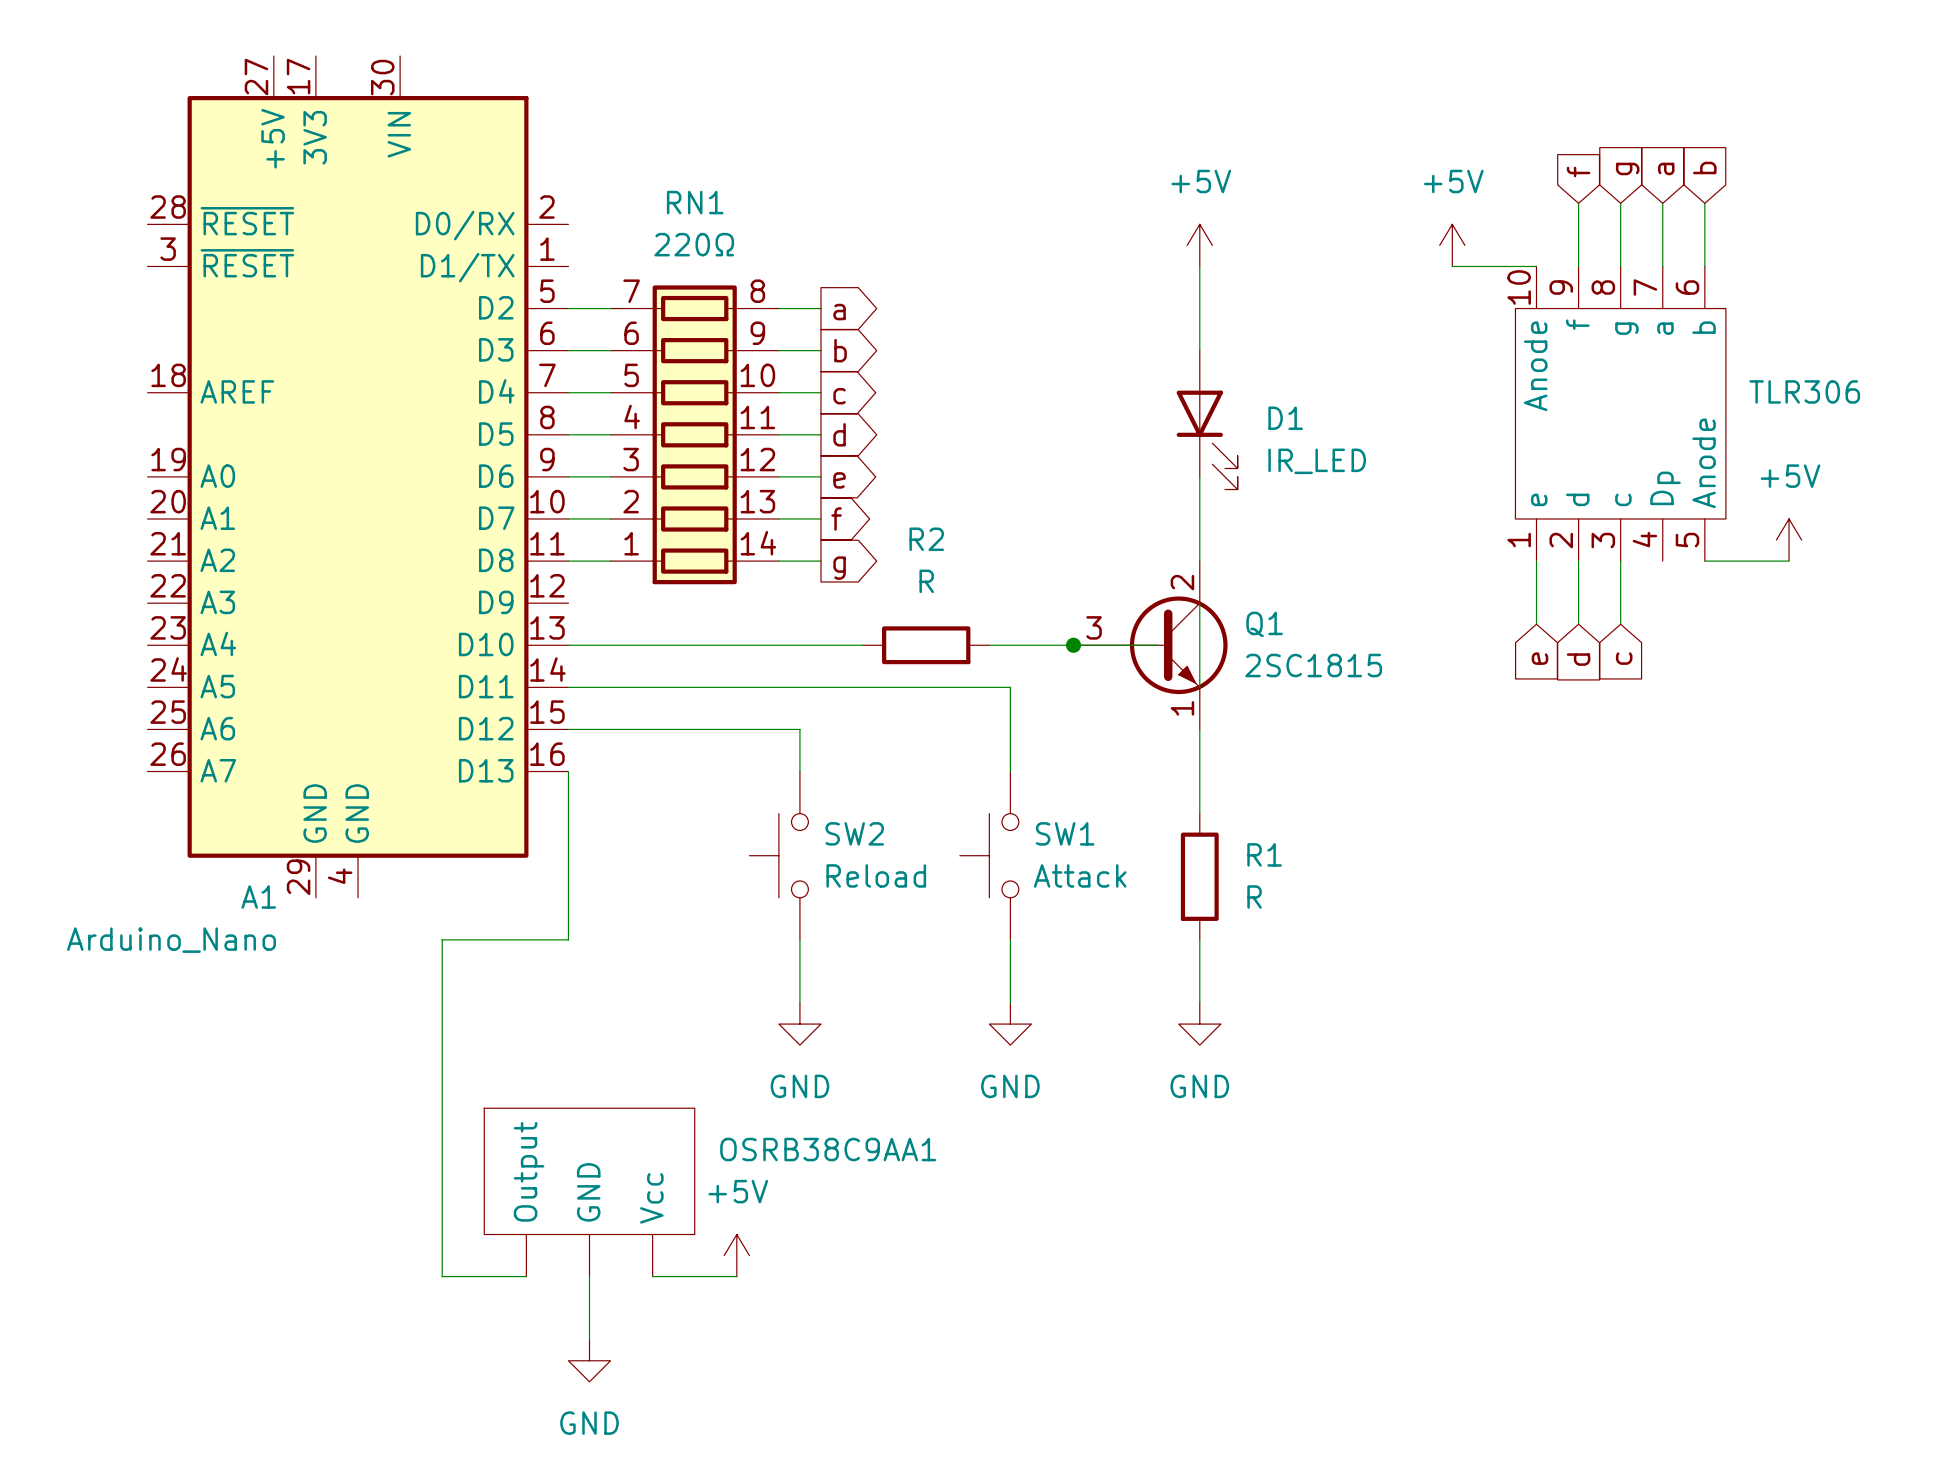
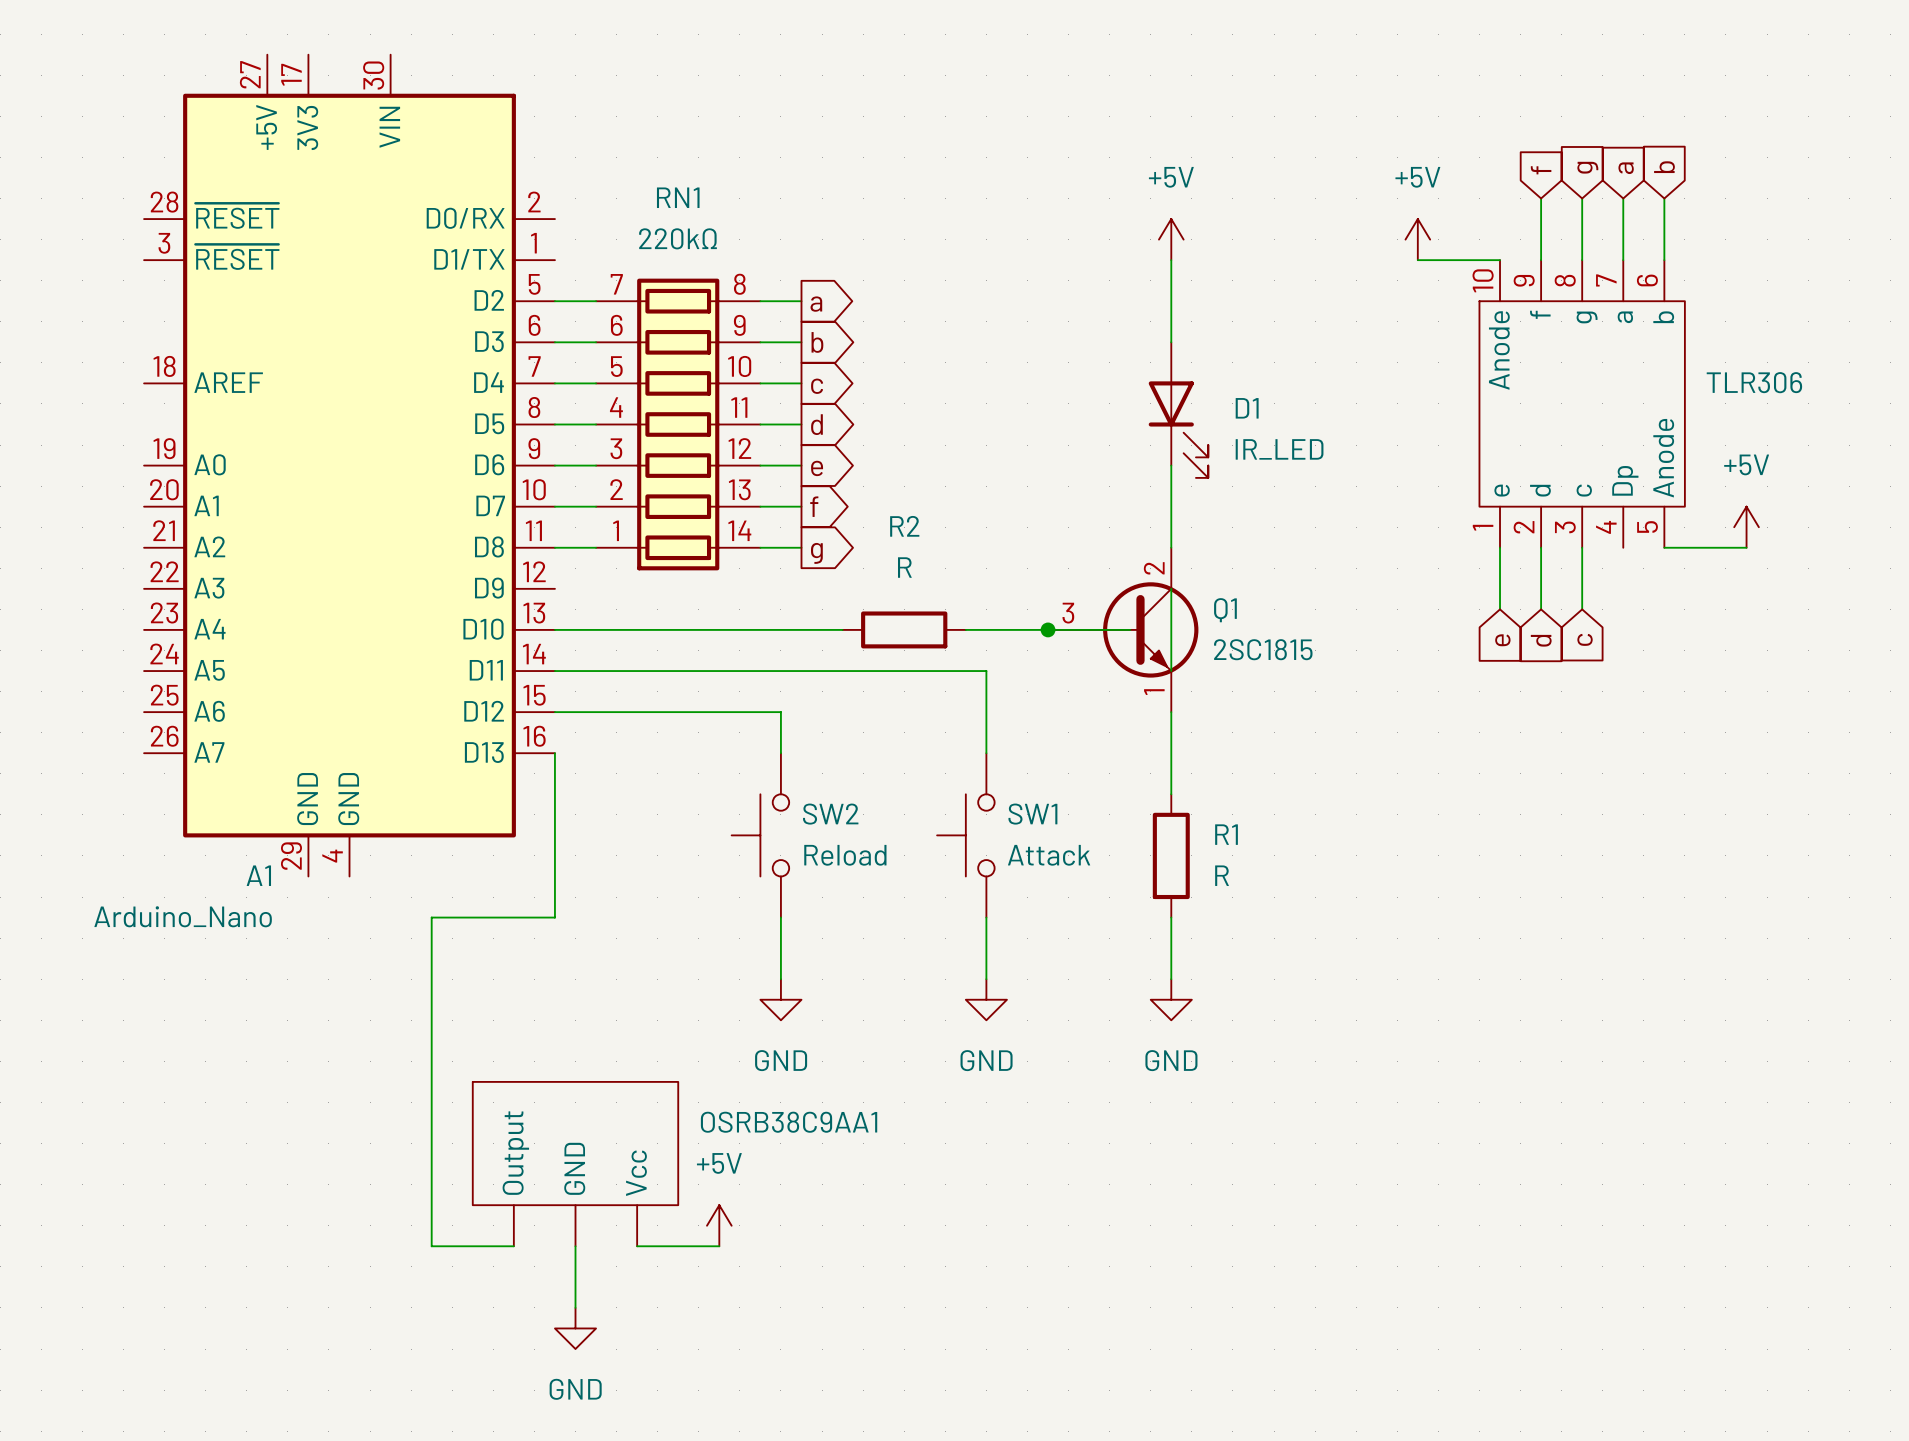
RN1 value: 220Ω (694, 244) -> 220kΩ (678, 238)

